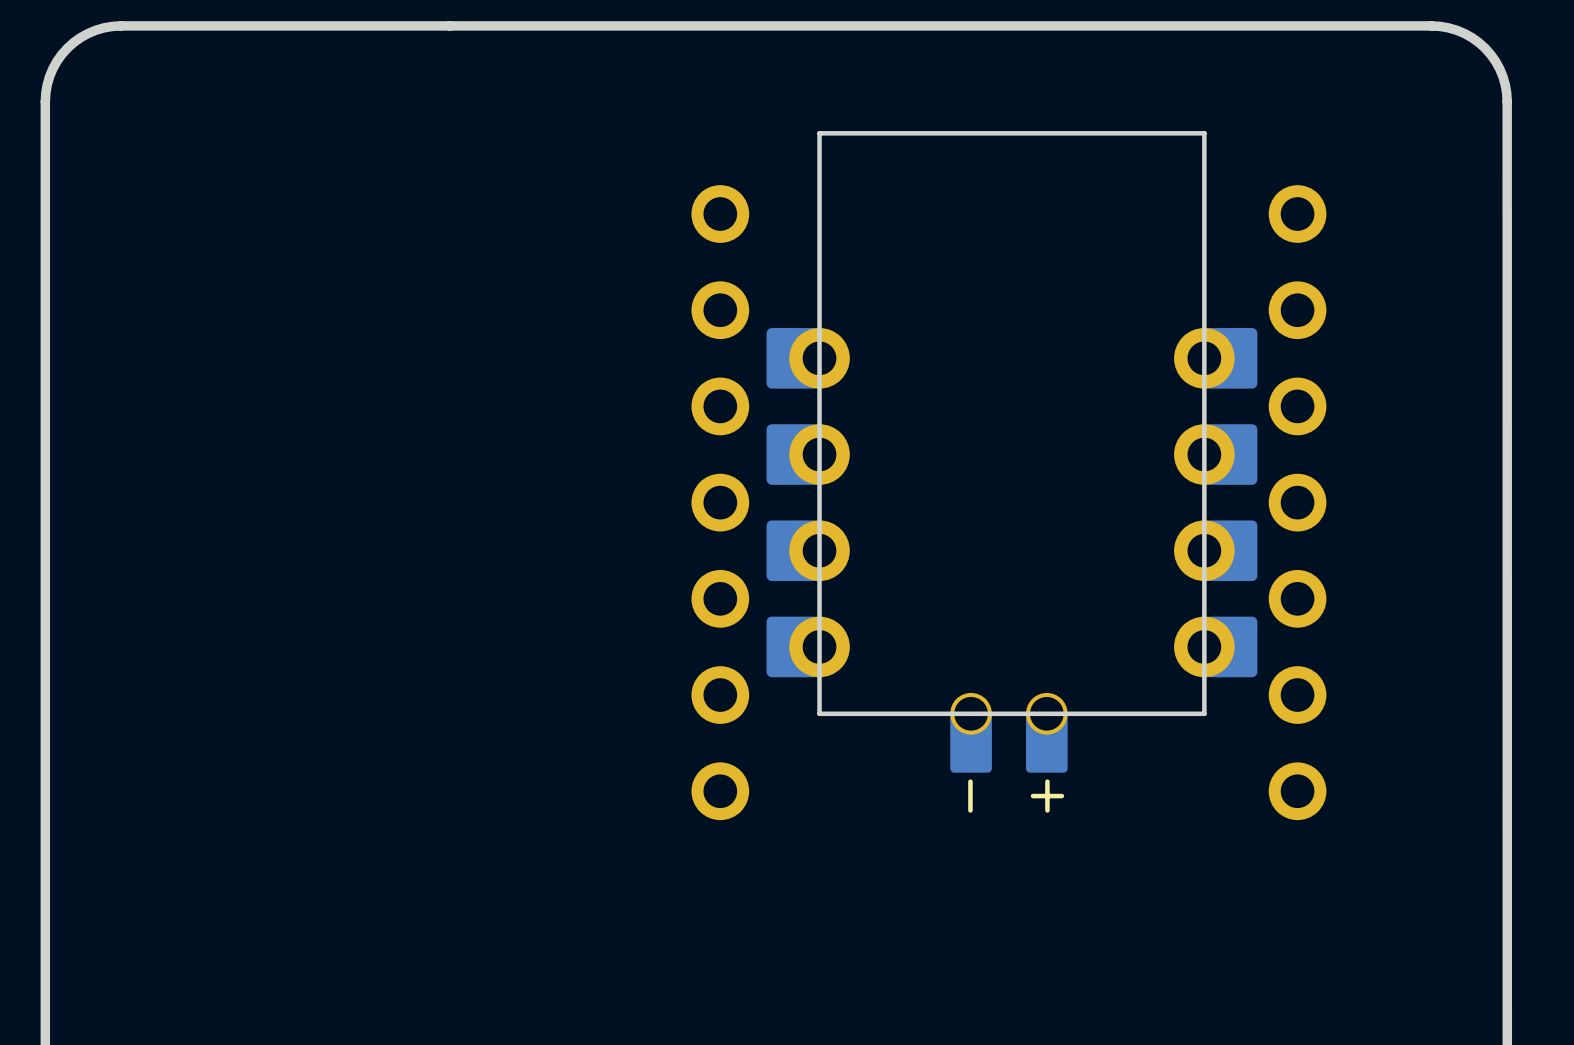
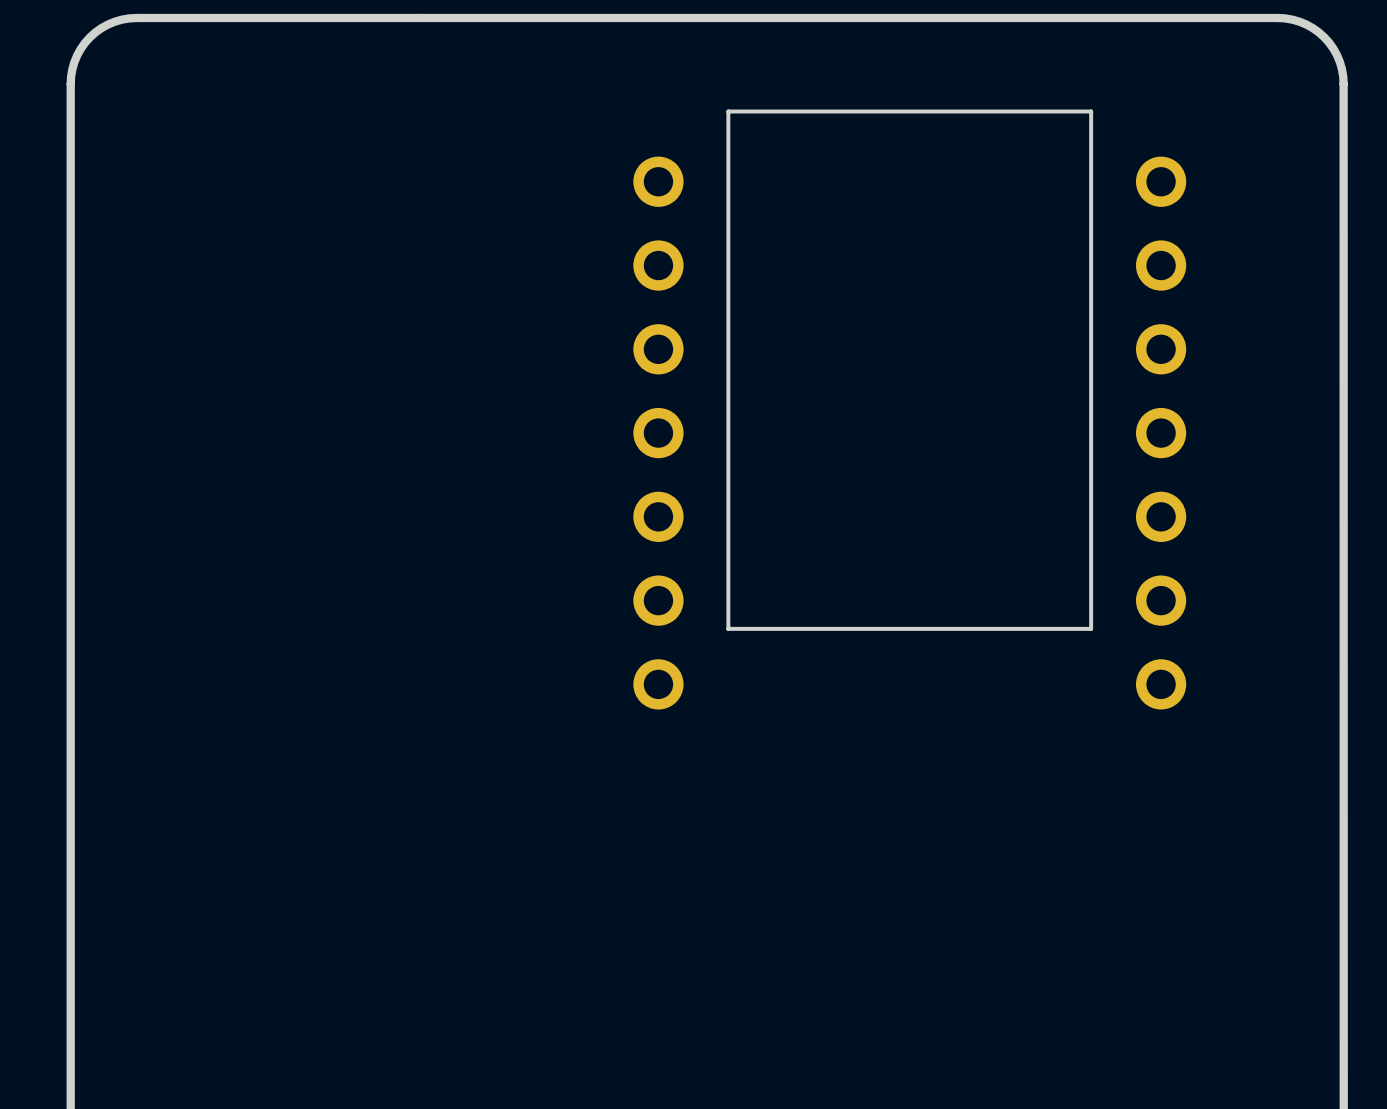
part footprint: [691, 131, 1327, 821] -> [633, 109, 1187, 710]

